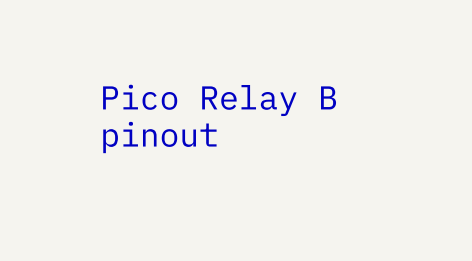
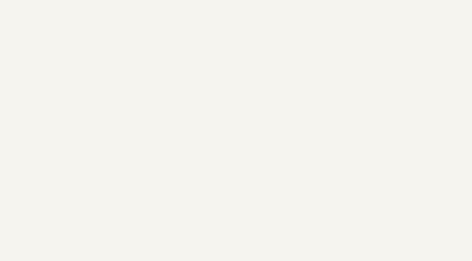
text: Pico Relay B (219, 100) -> none
text: pinout (159, 137) -> none

